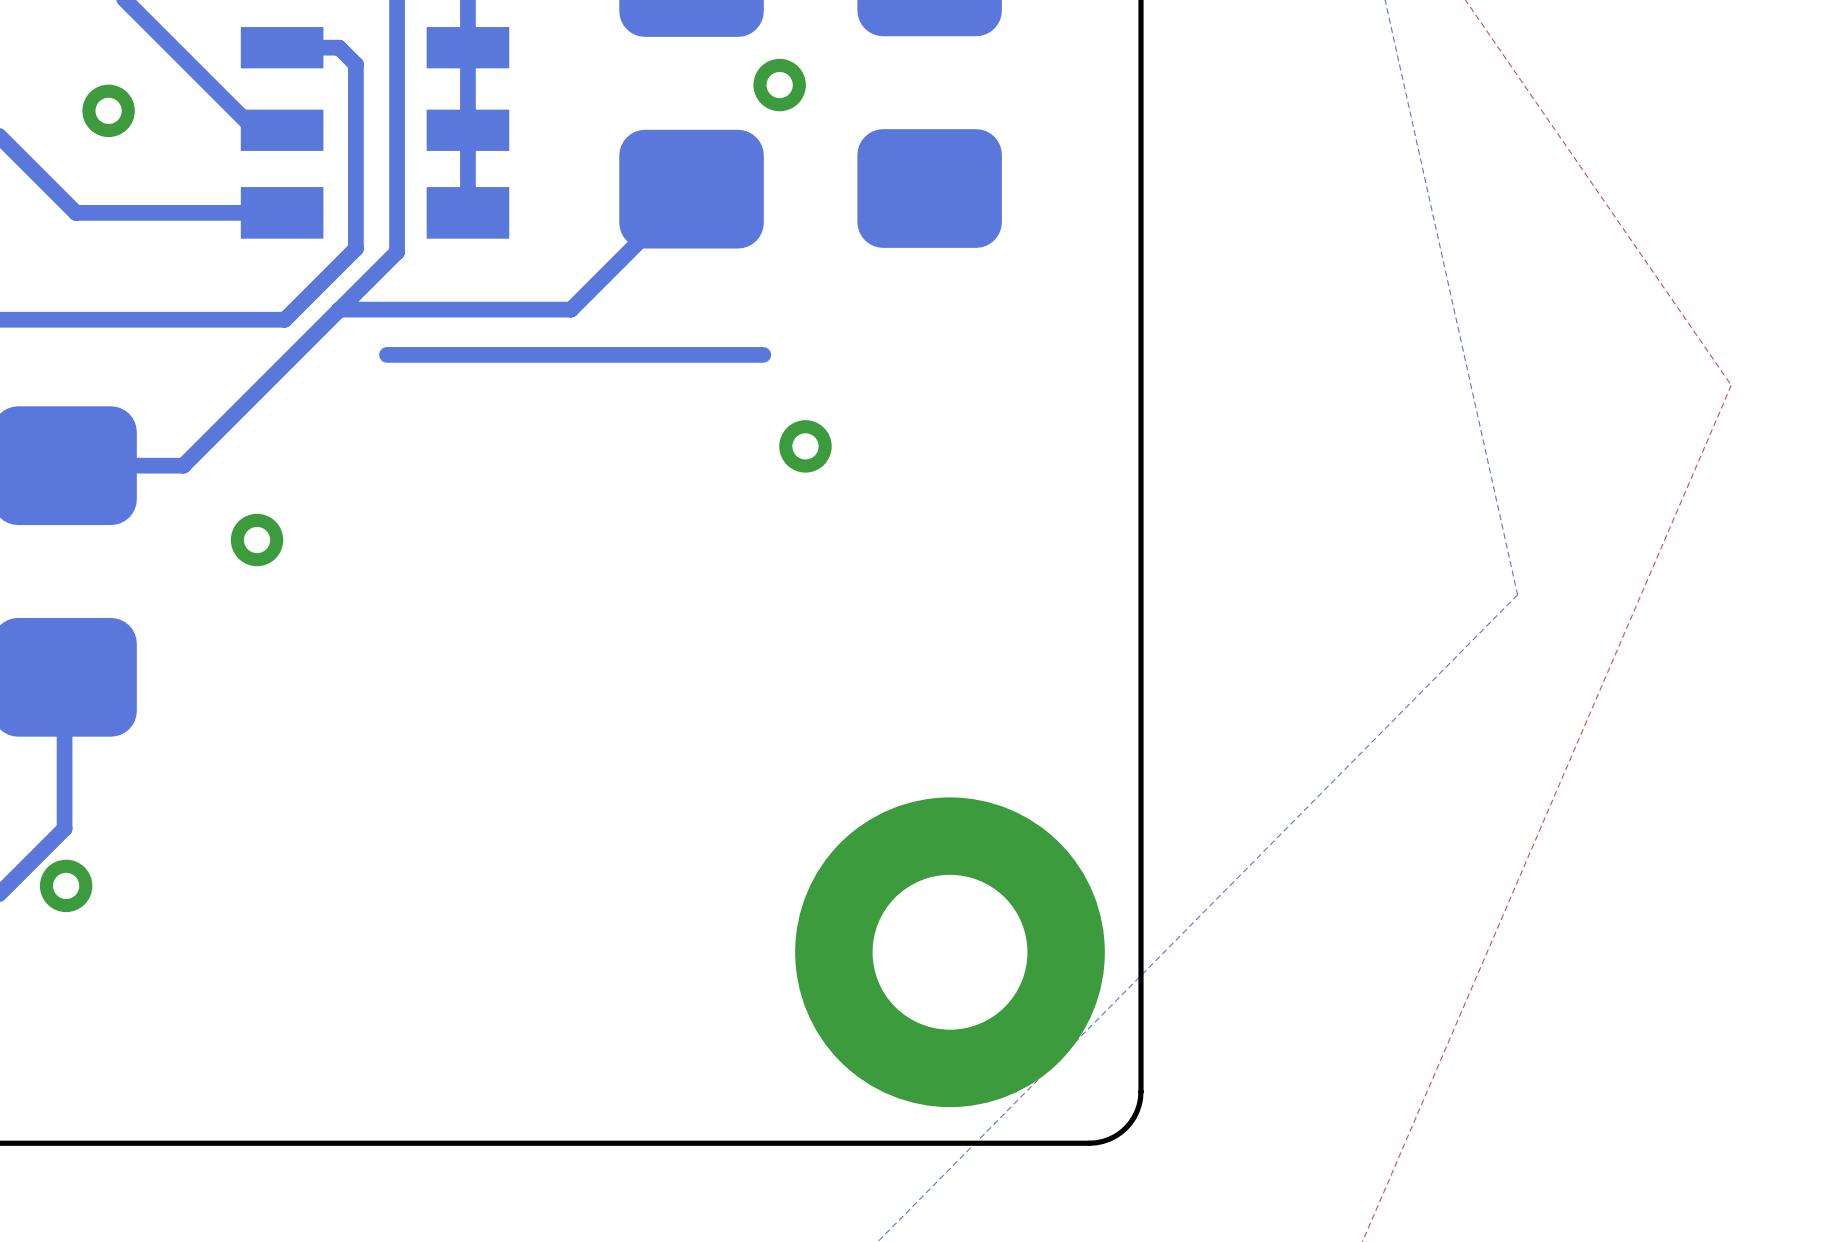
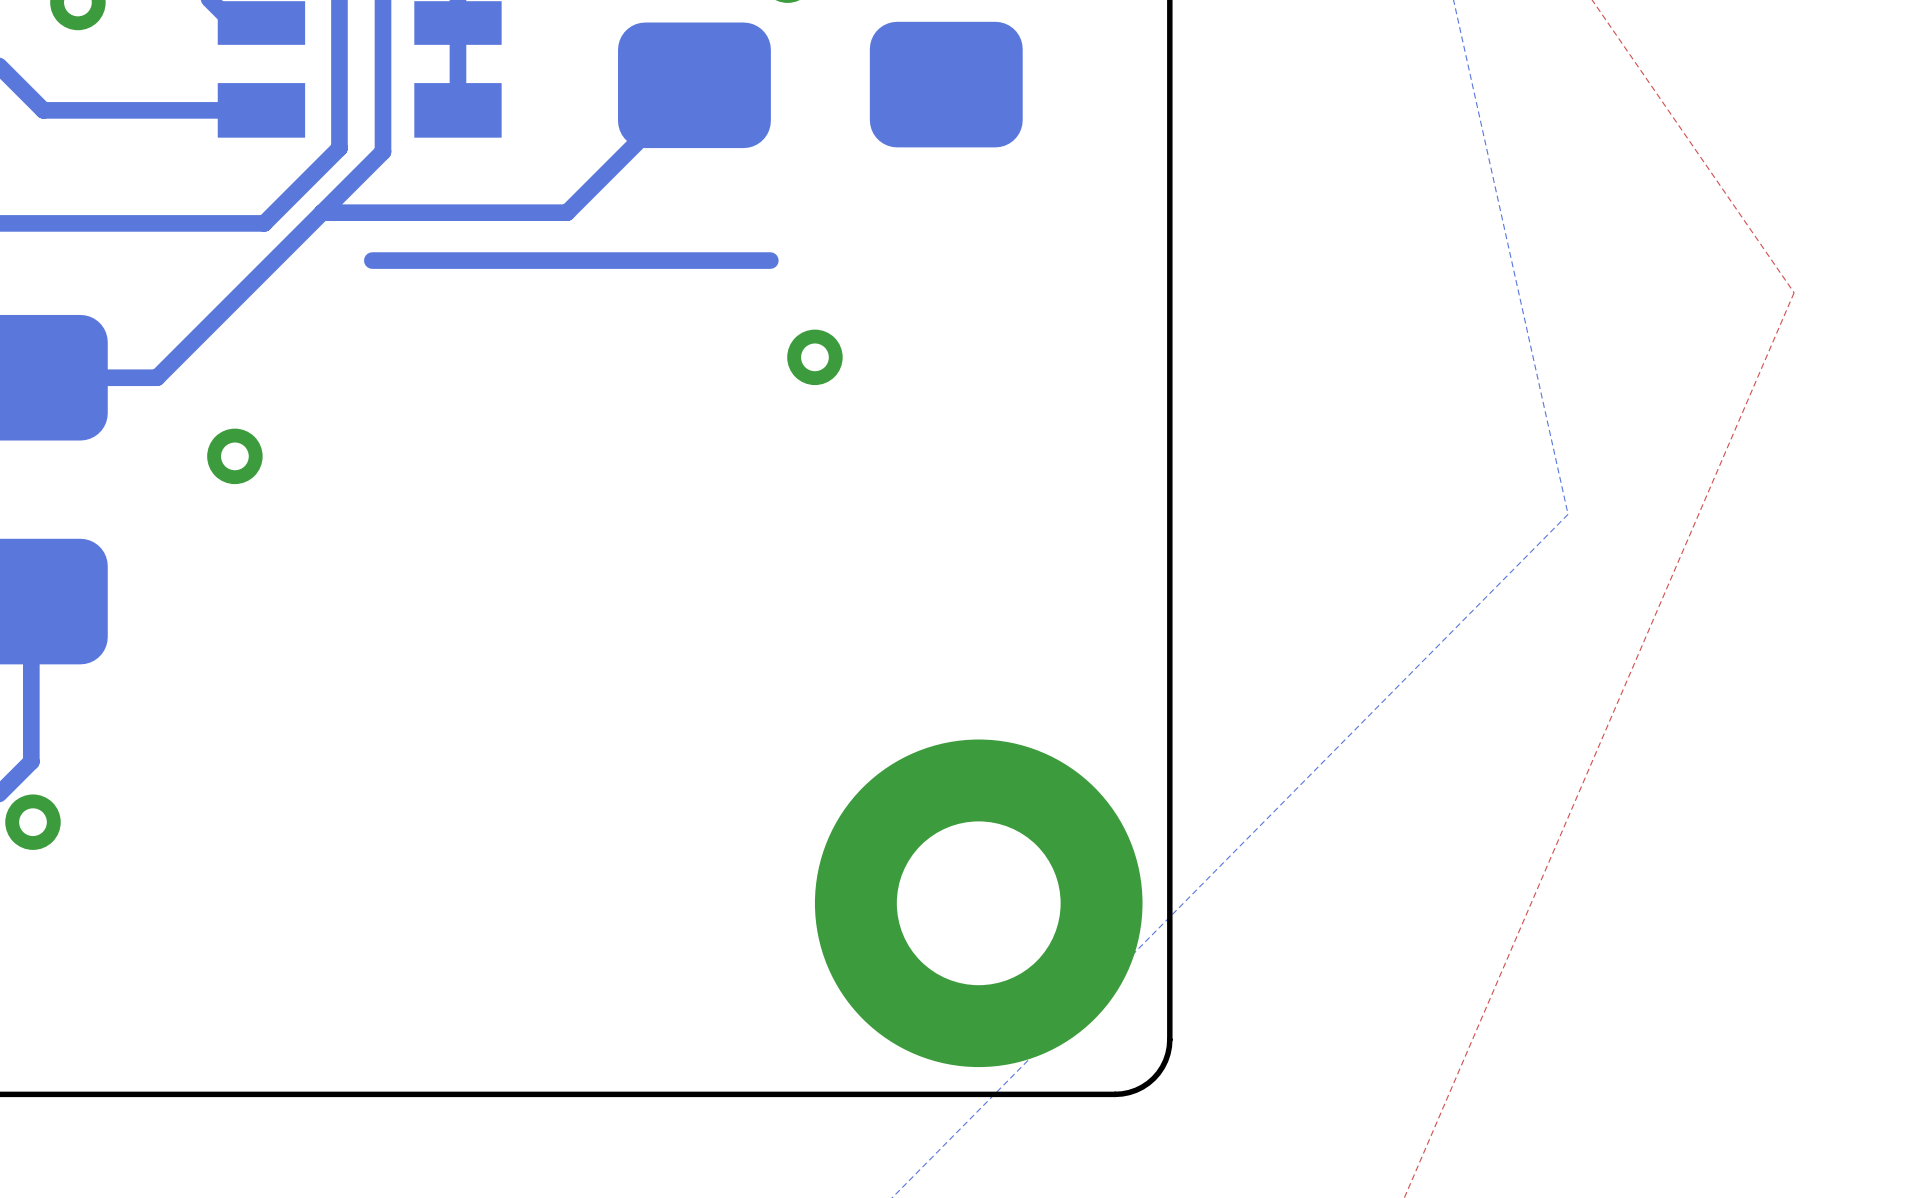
part position: (950, 952) -> (978, 903)

